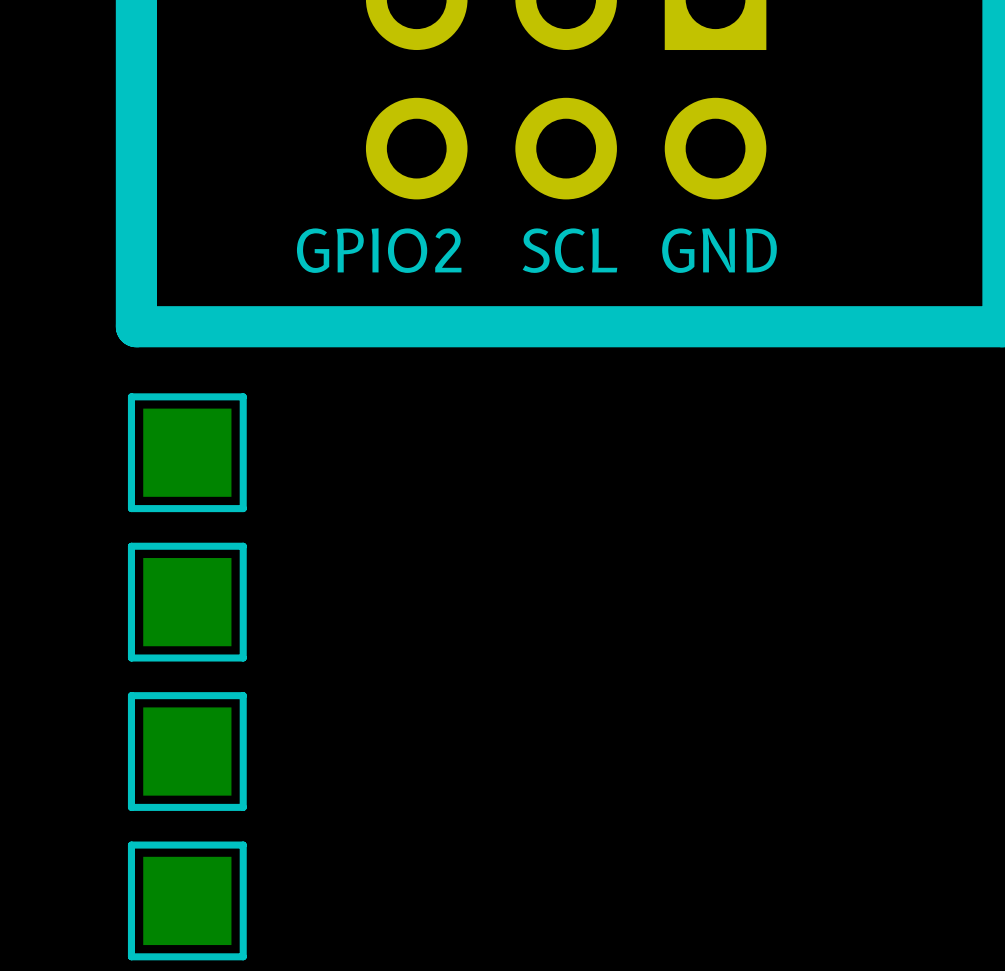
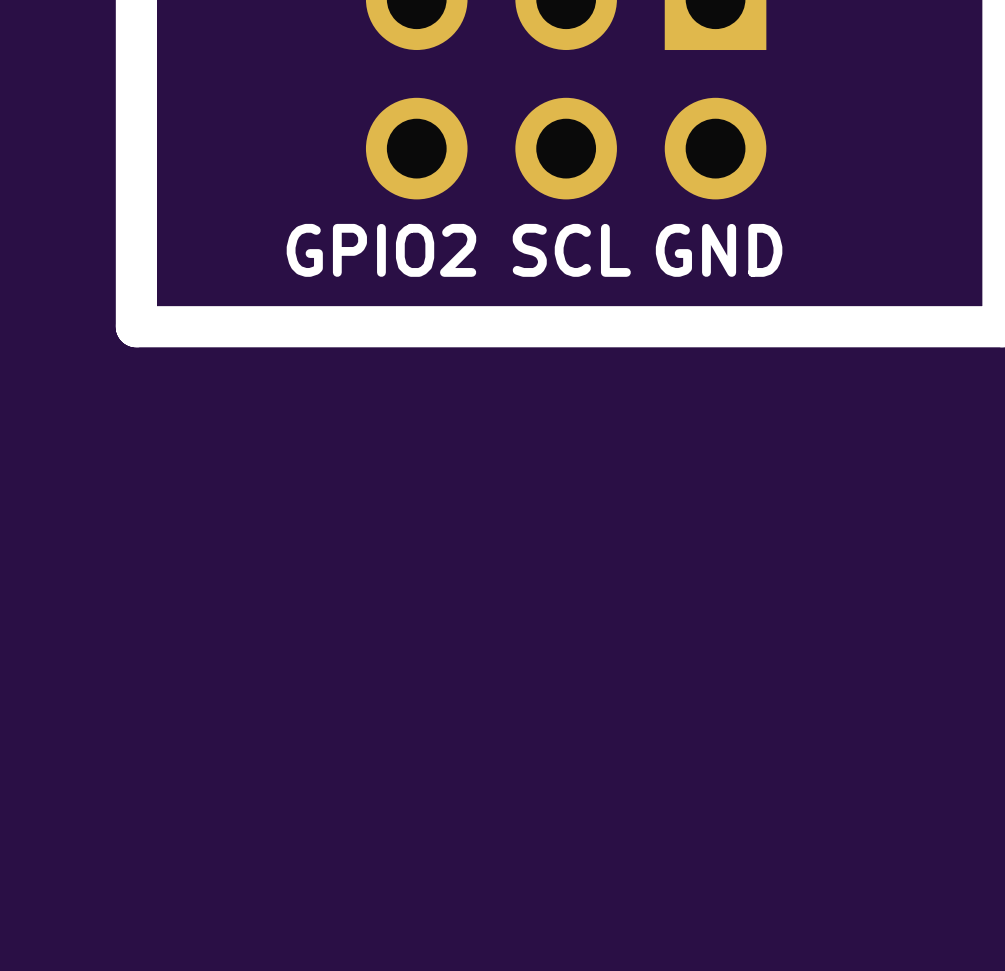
part: (187, 452) -> none
part: (187, 602) -> none
part: (187, 751) -> none
part: (187, 900) -> none

